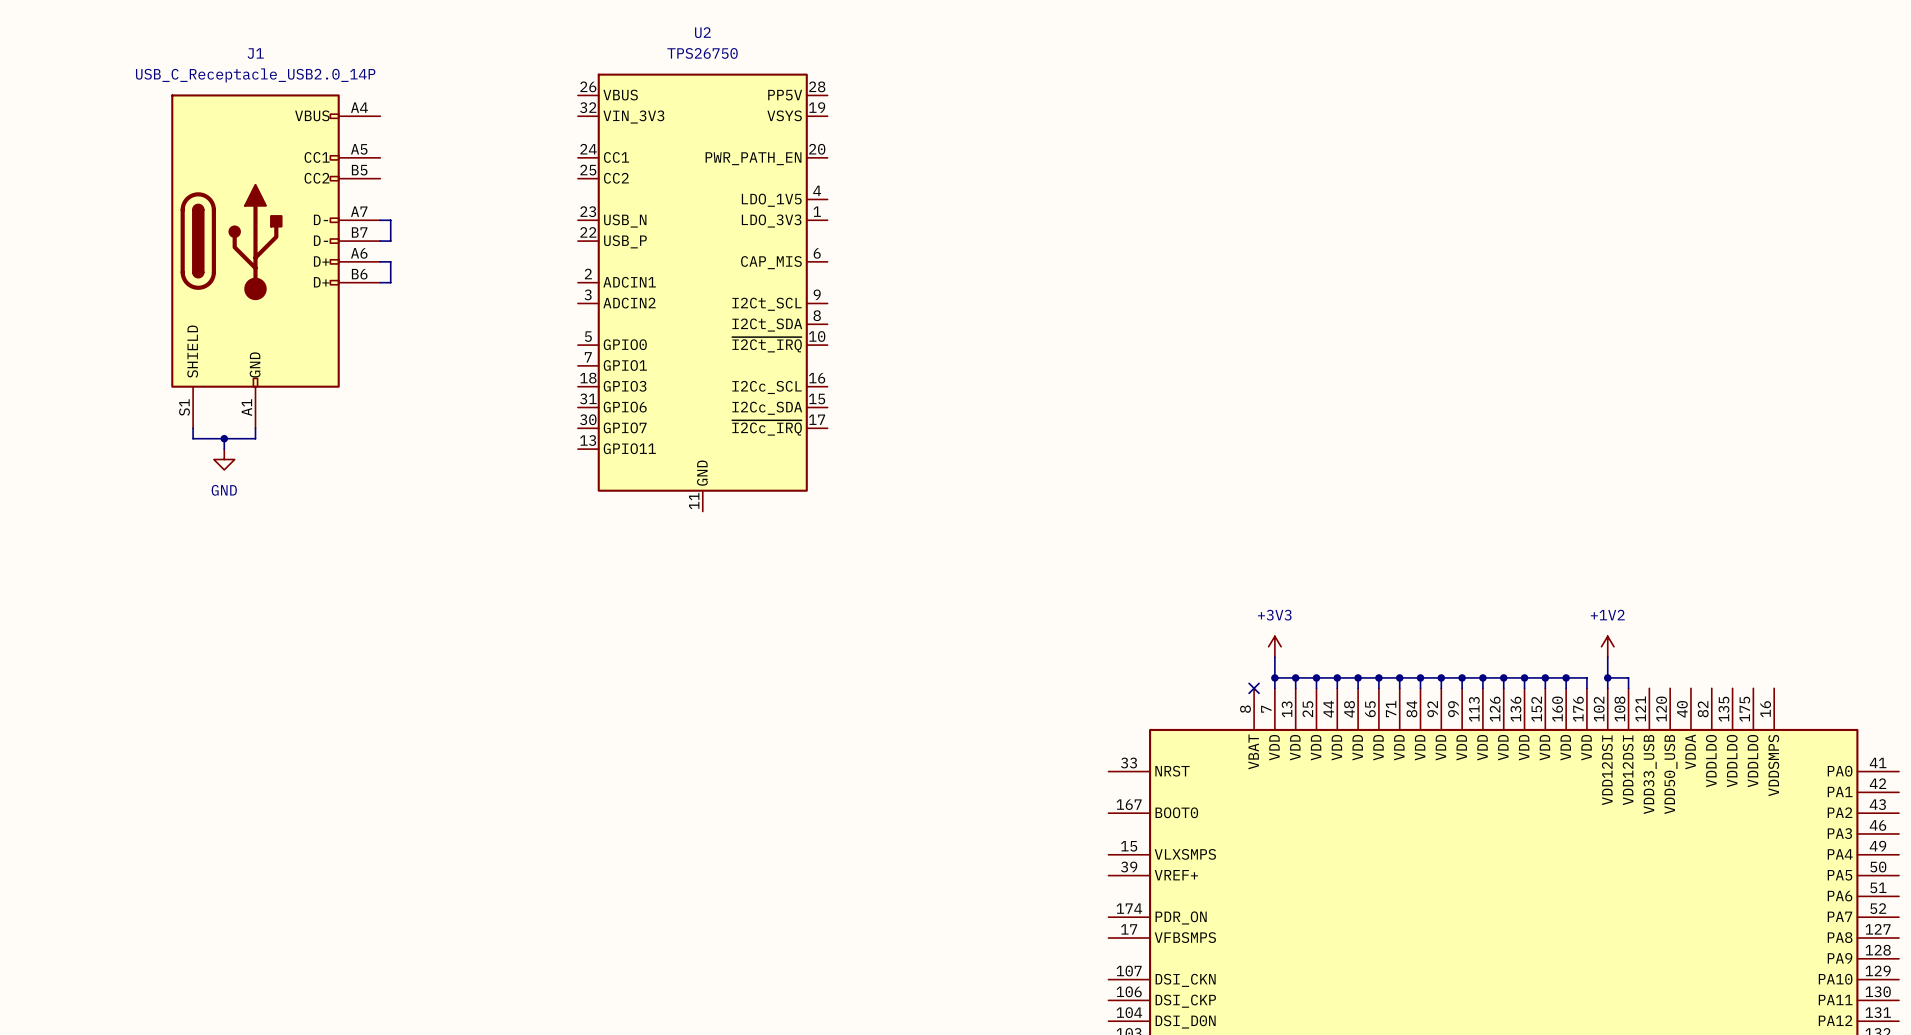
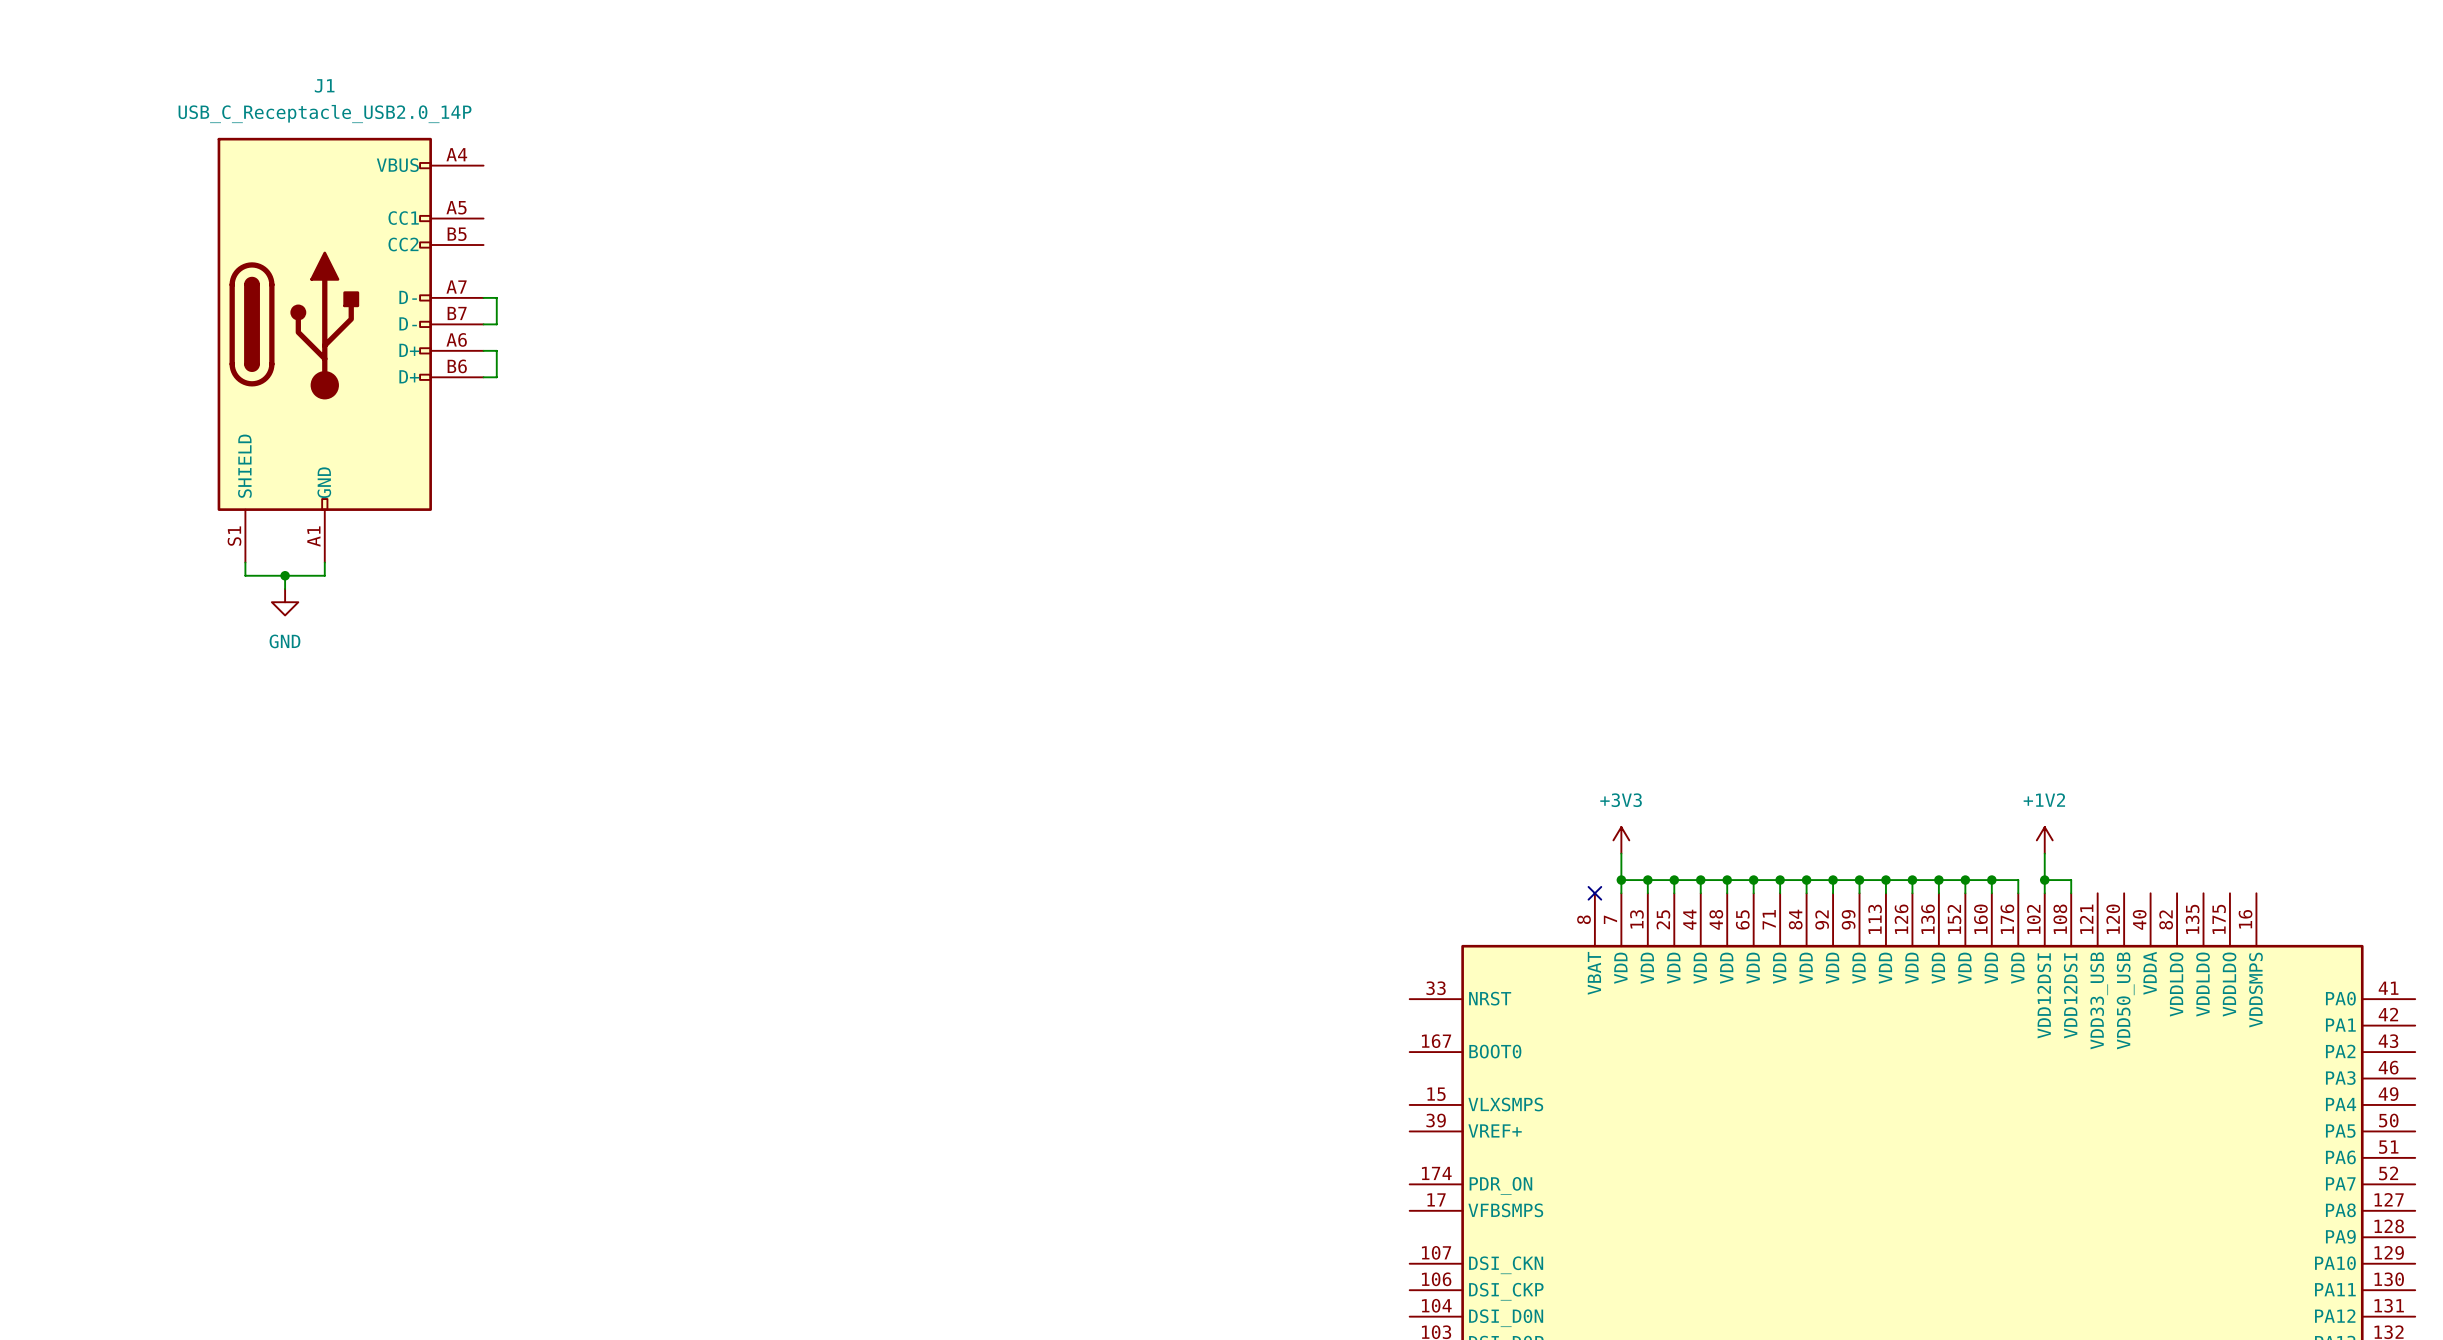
U2: TPS26750 (702, 292) -> none

